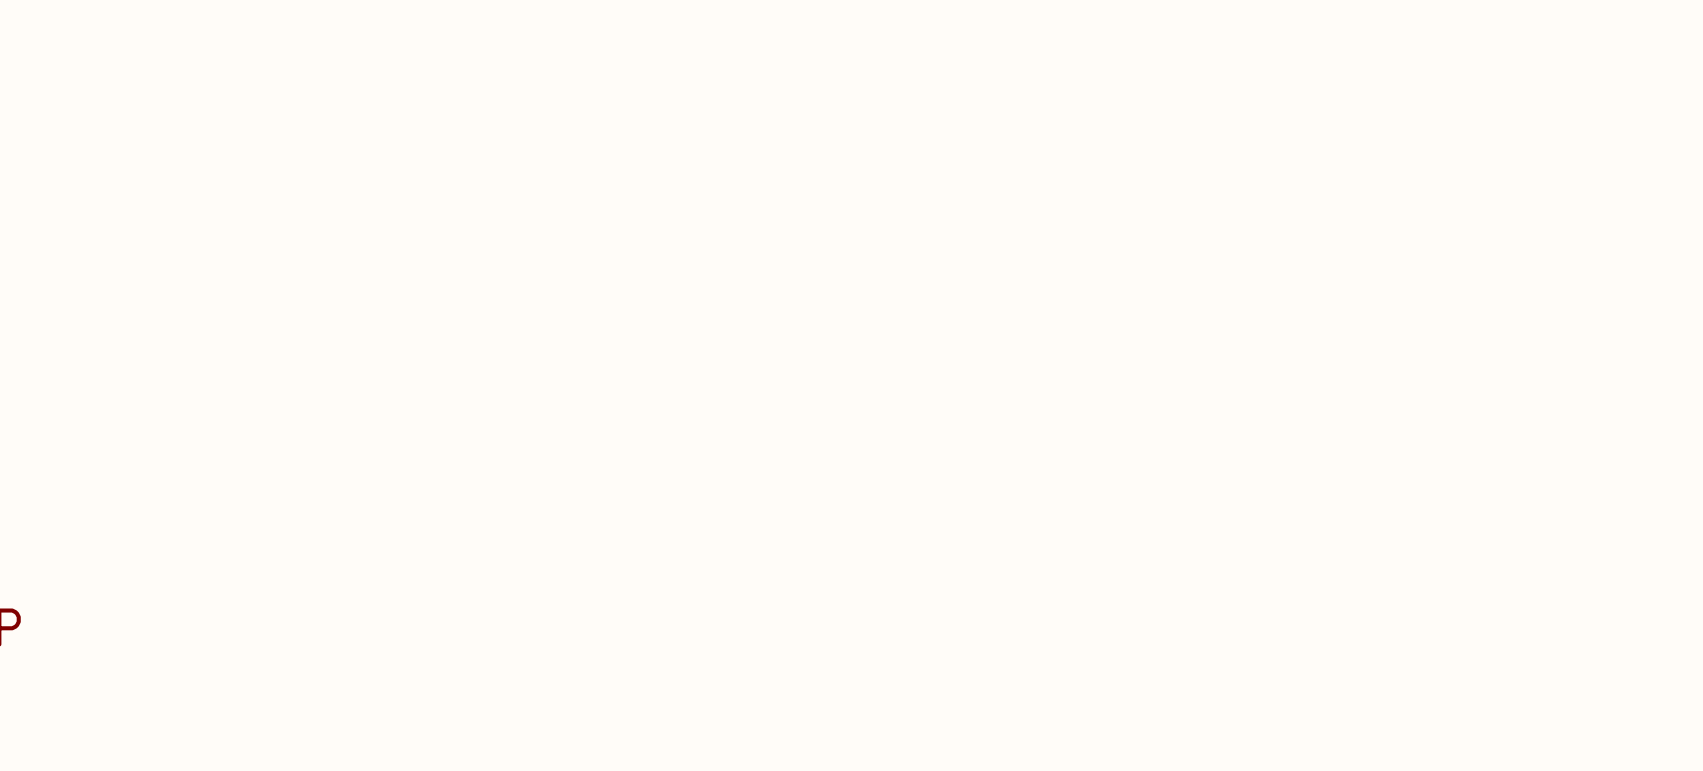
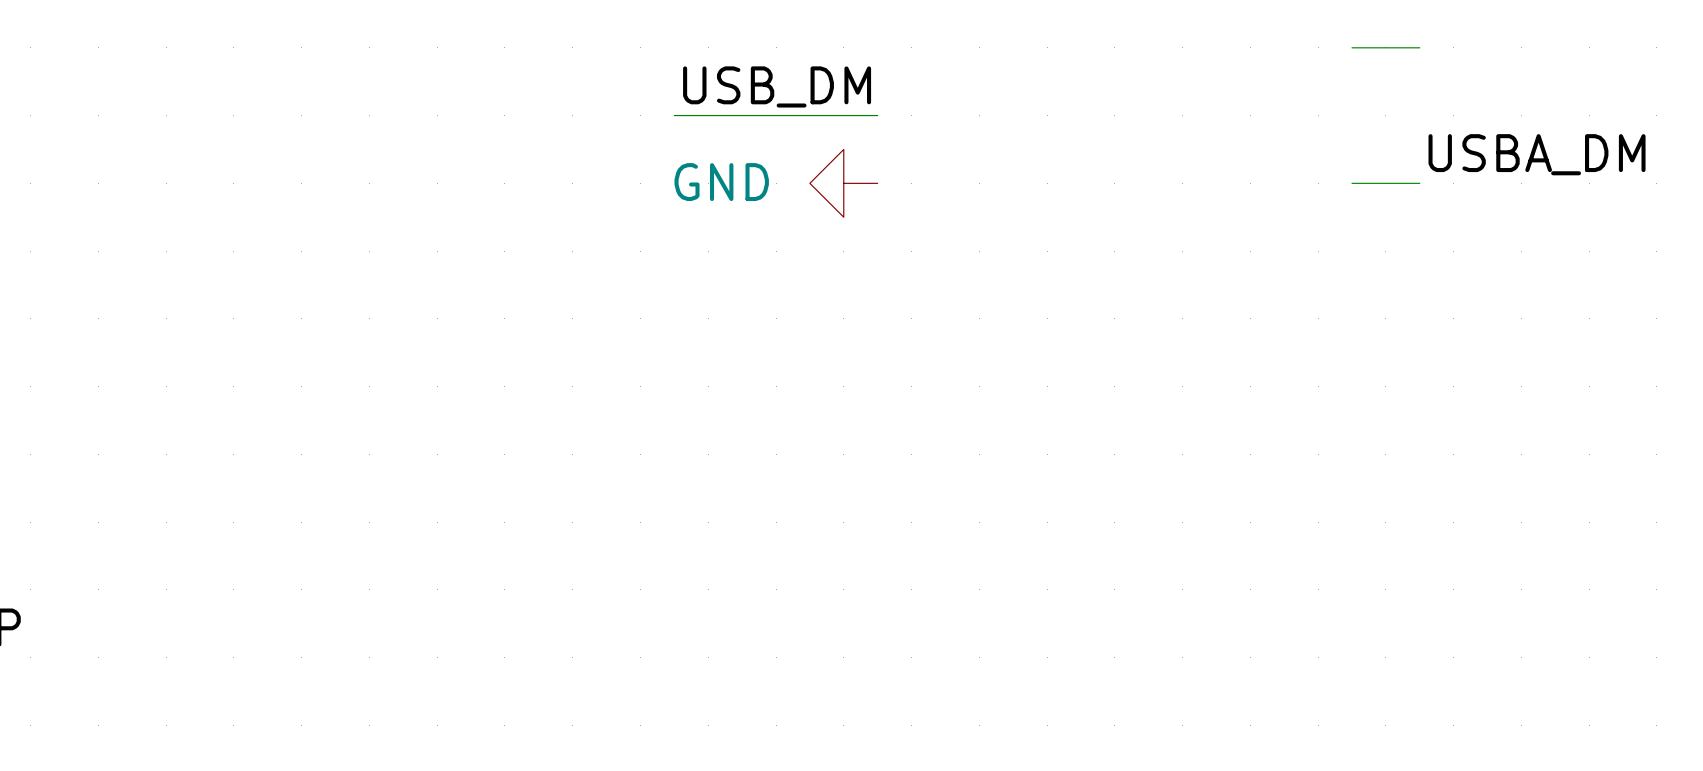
wire: none -> (1352, 47) (1419, 47)
label: none -> USB_DM (777, 86)
wire: none -> (674, 115) (877, 115)
label: none -> USBA_DM (1537, 154)
power symbol: none -> GND (843, 183)
wire: none -> (1352, 183) (1419, 183)

